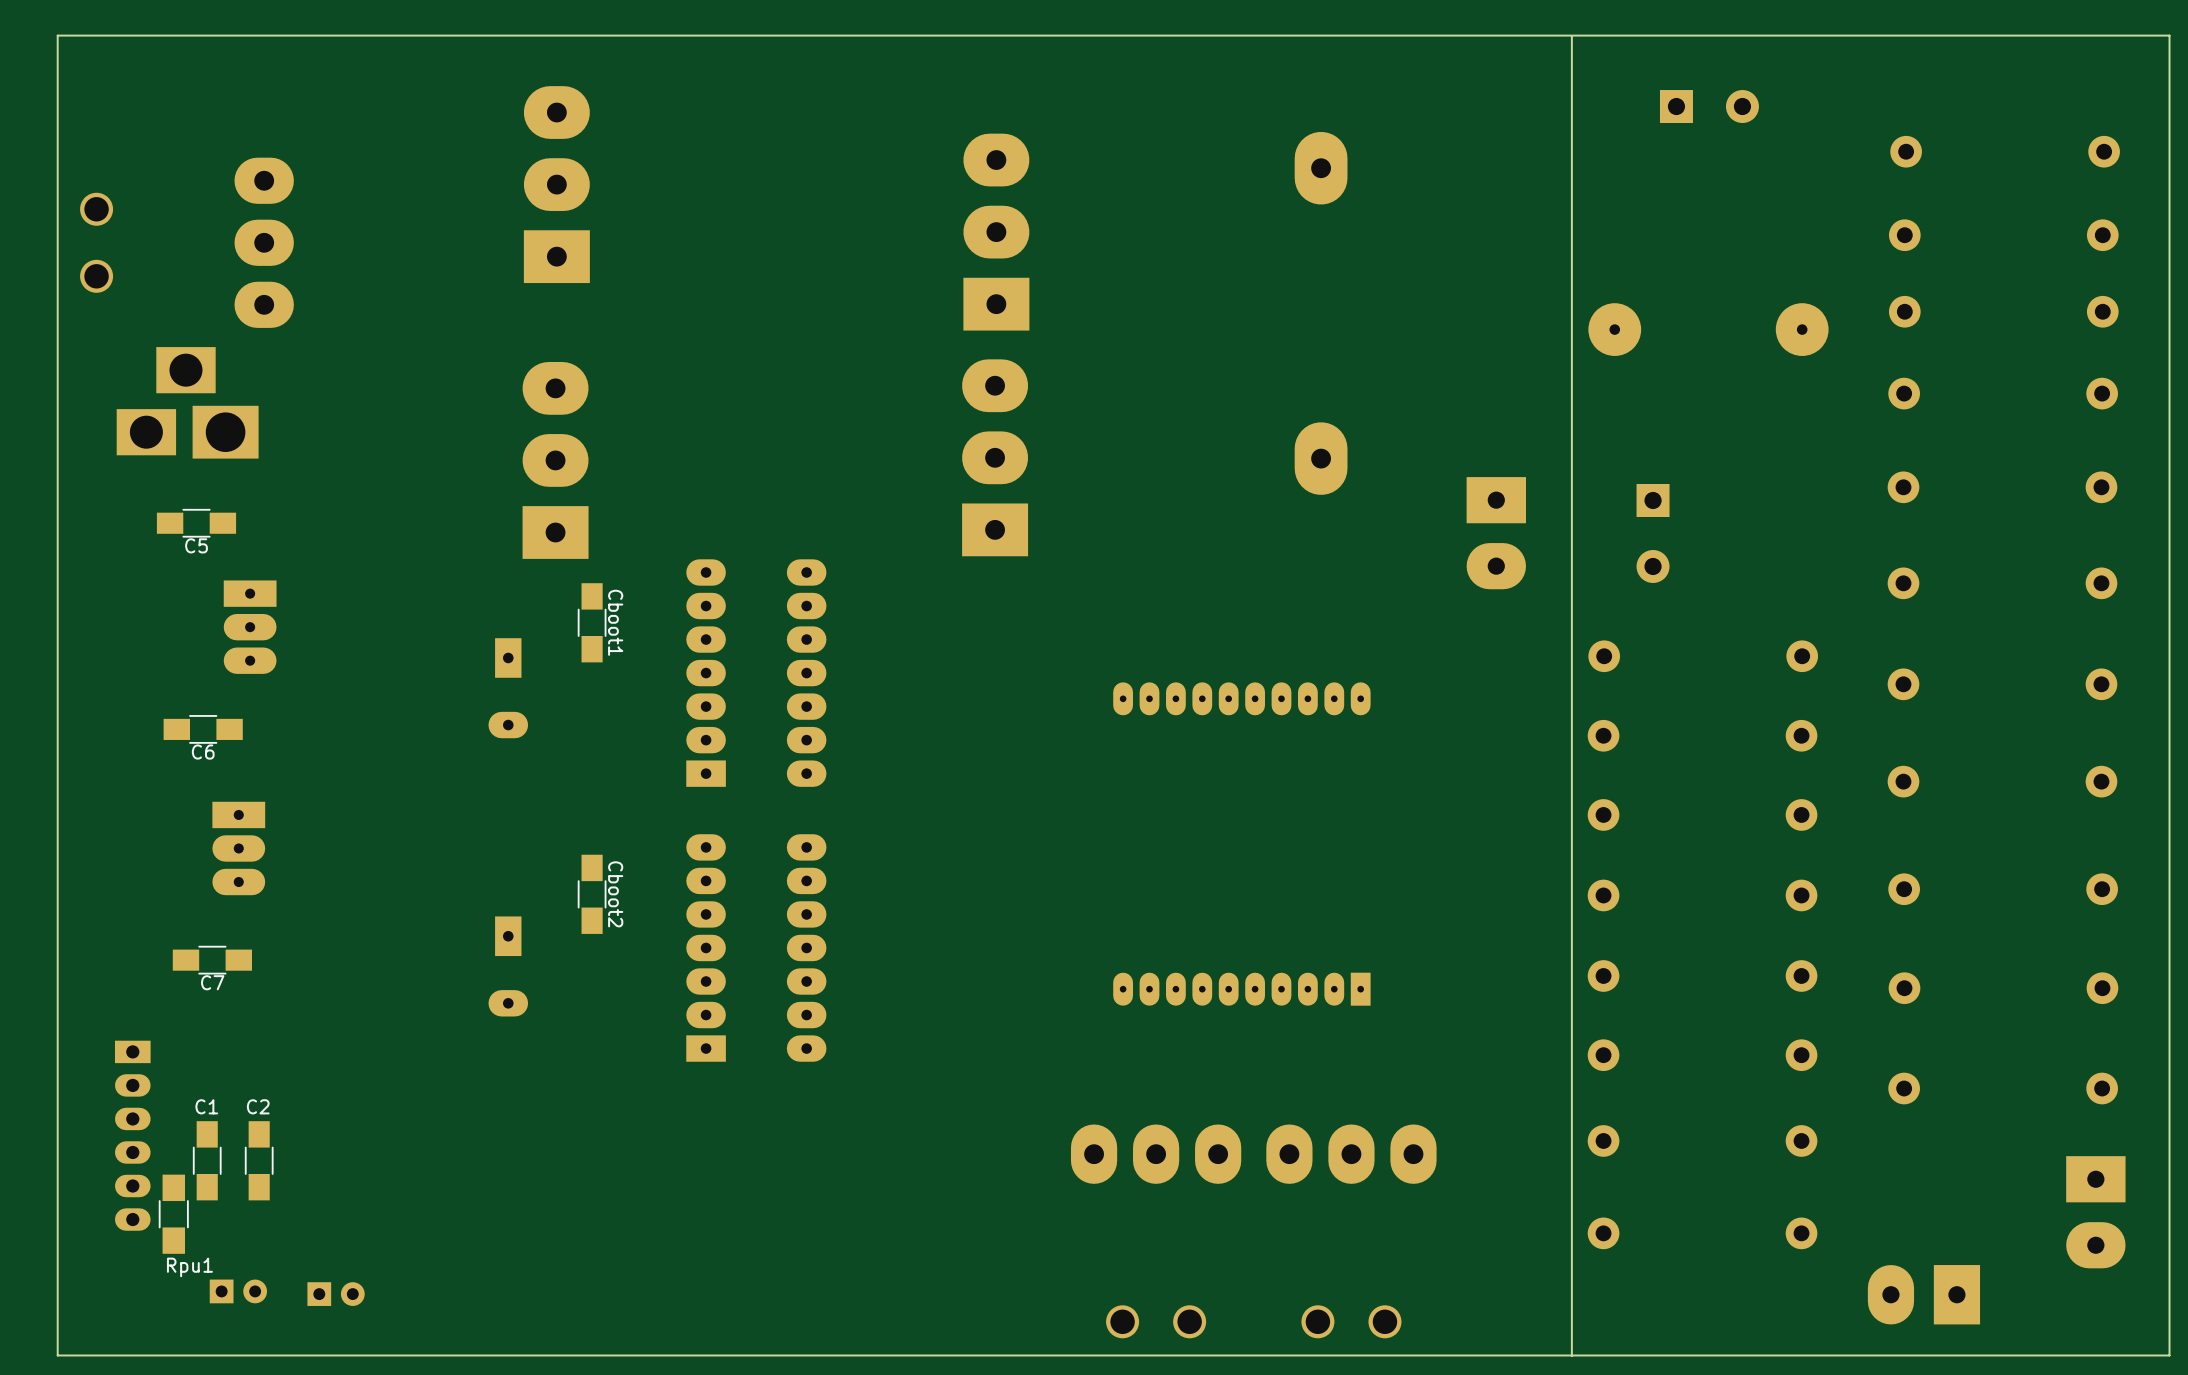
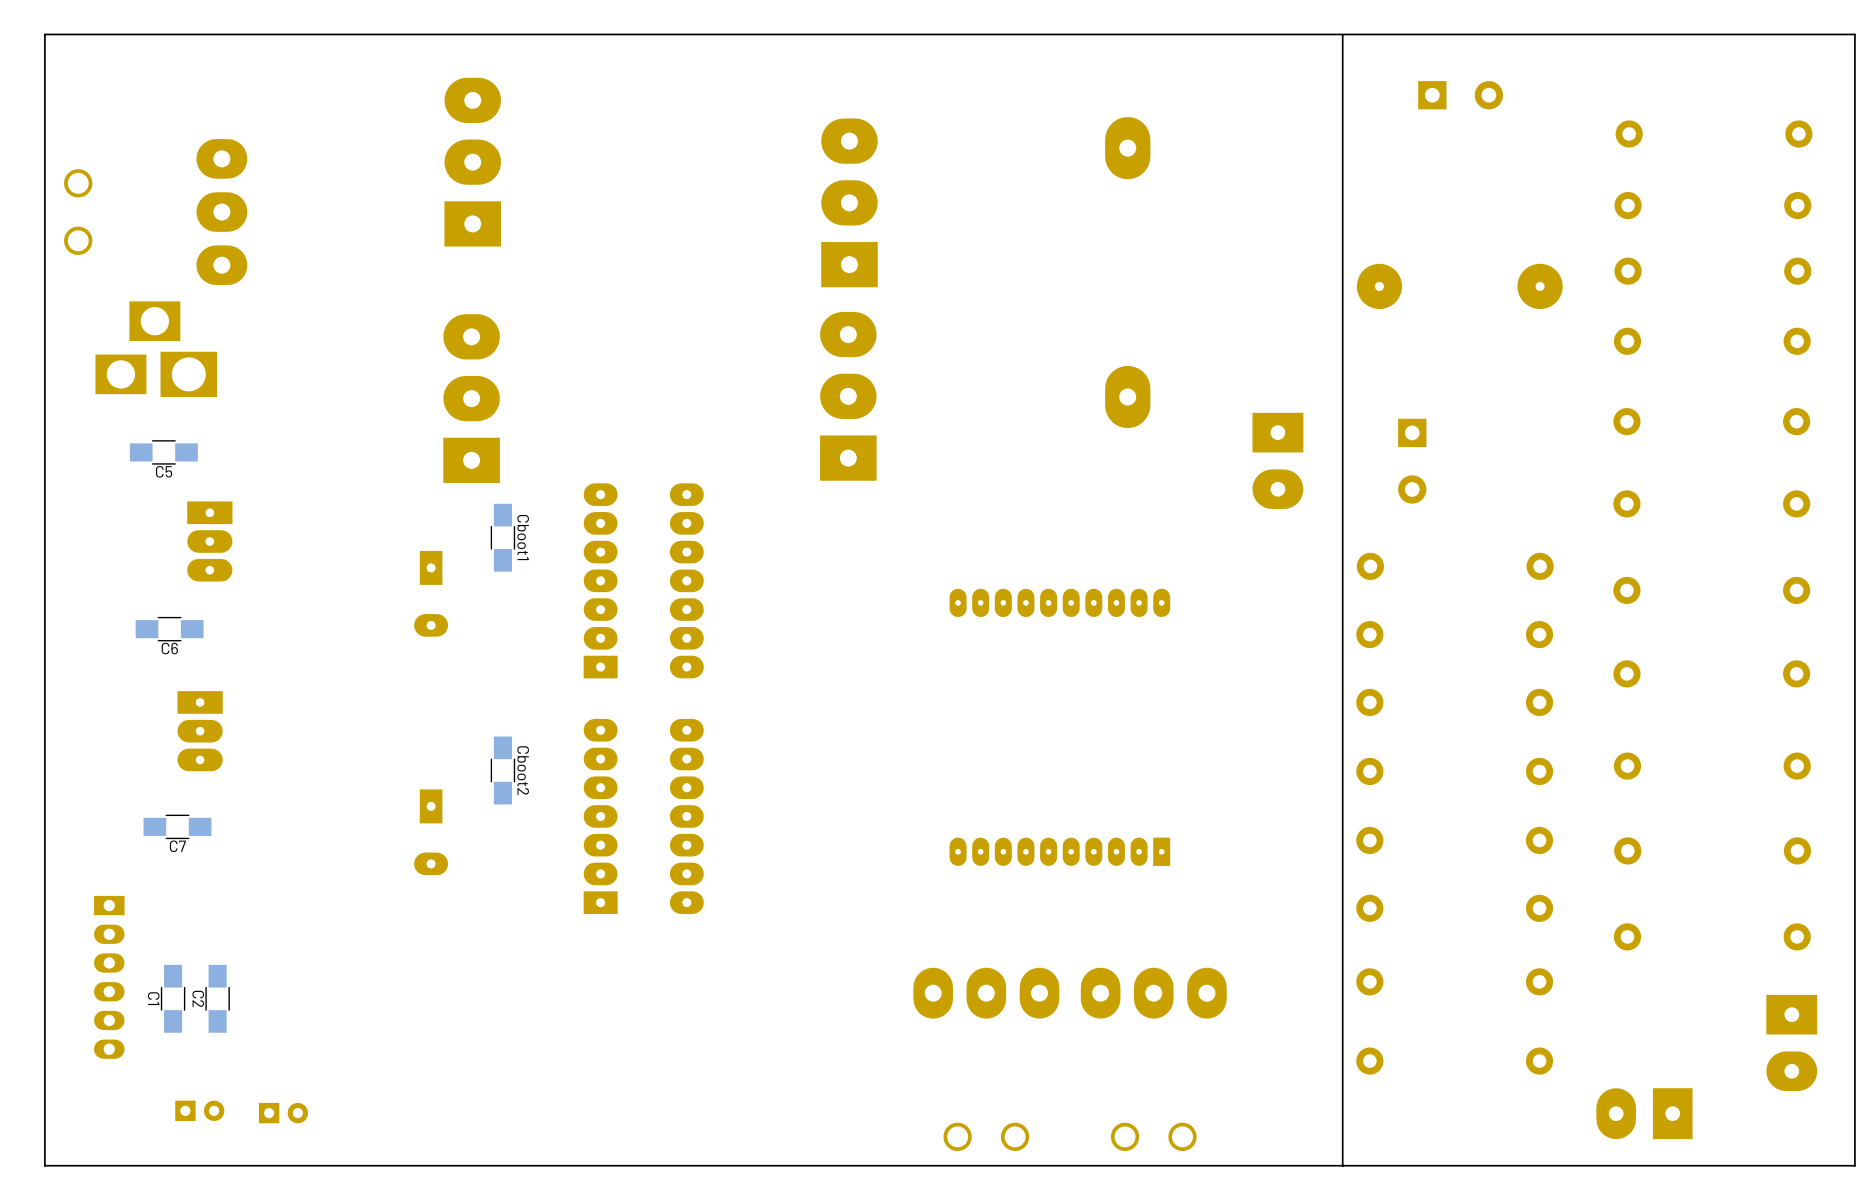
C1 name rotation: 0° (206, 1106) -> 90° clockwise (153, 998)
C1 name position: C1 (206, 1106) -> C1 (153, 998)
C2 name rotation: 0° (258, 1106) -> 90° clockwise (198, 998)
C2 name position: C2 (258, 1106) -> C2 (198, 998)
Rpu1: (173, 1214) -> none

